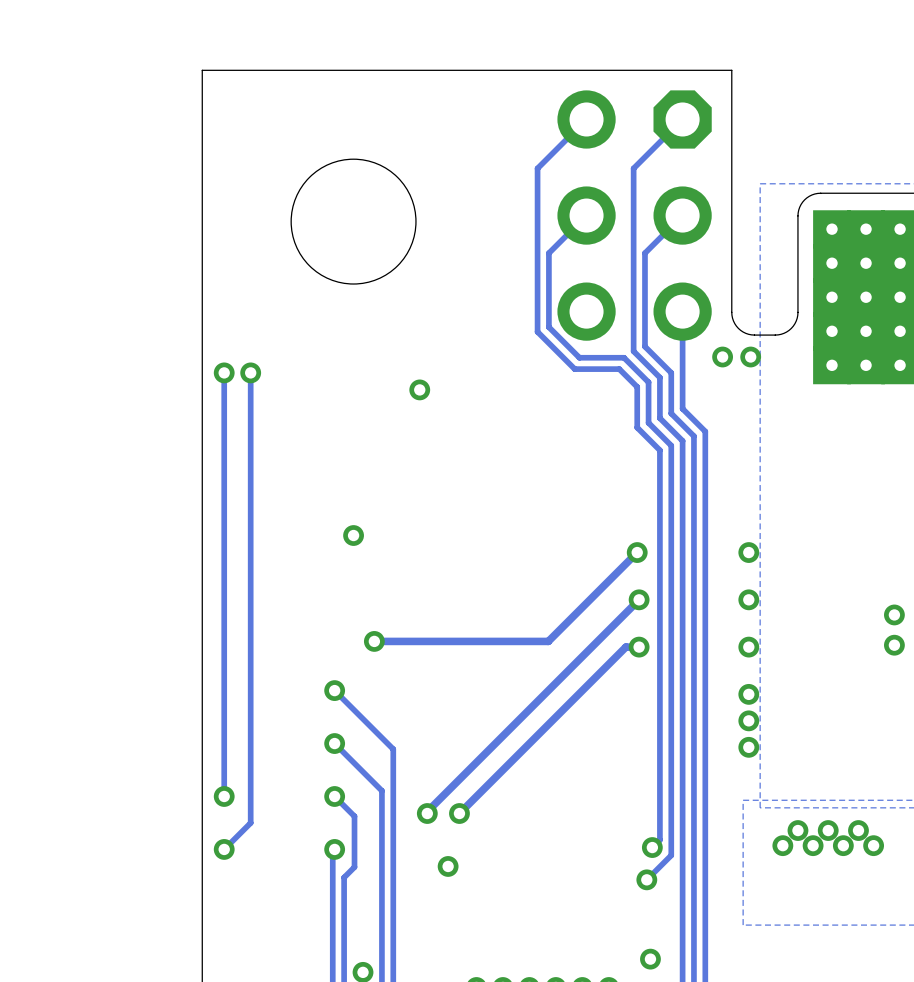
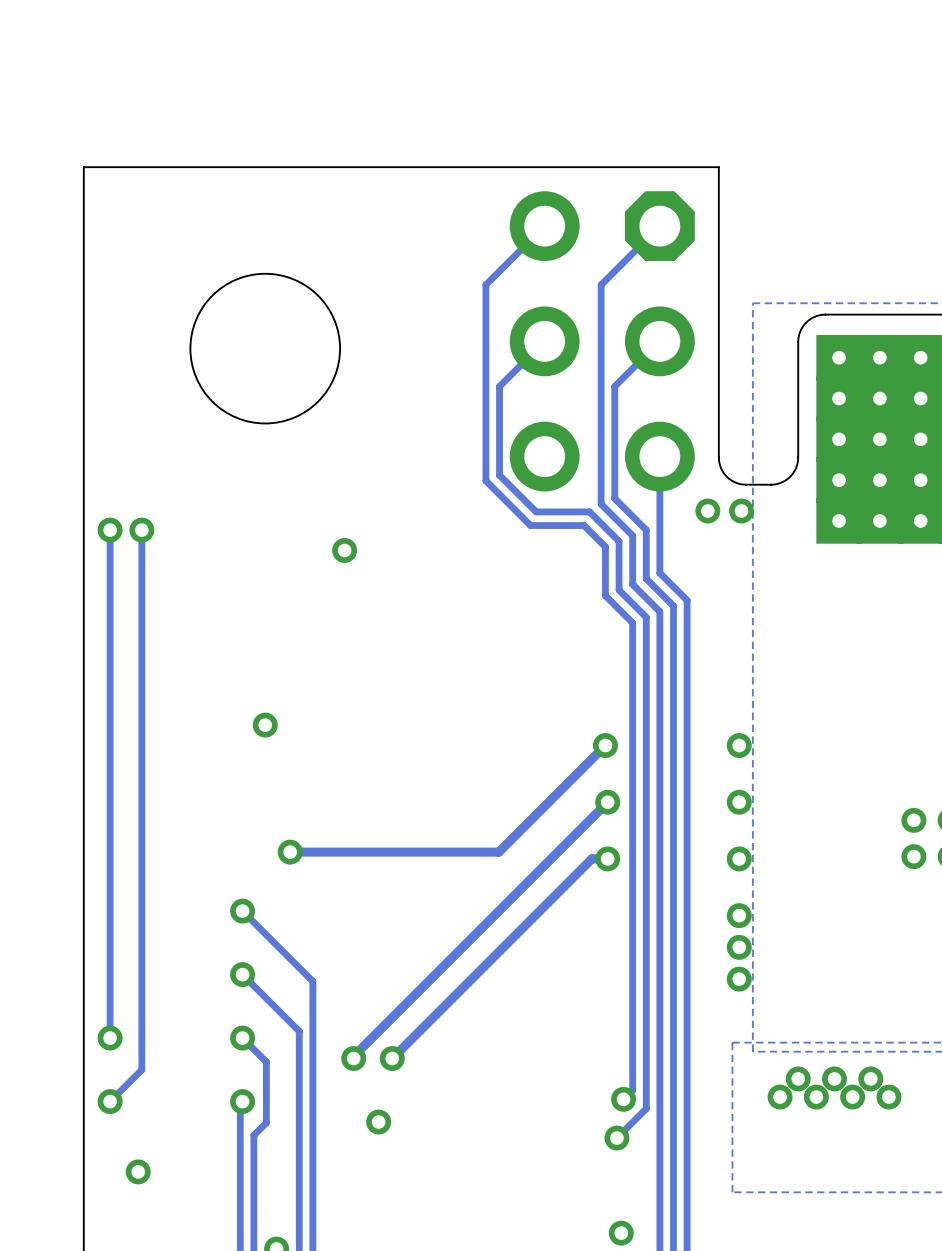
via: none -> (138, 1171)

